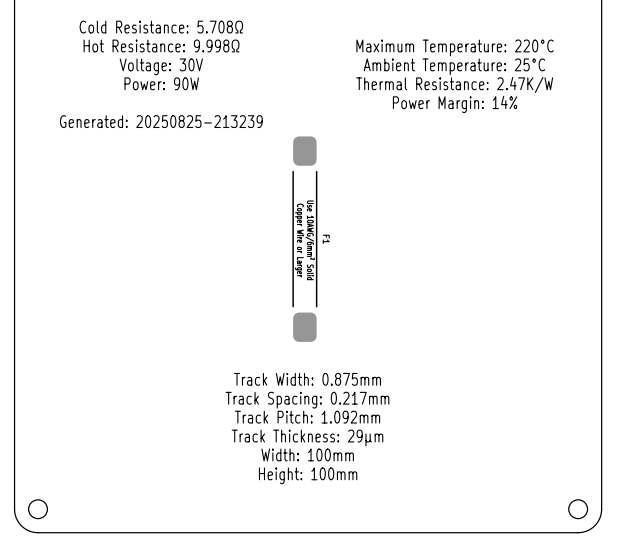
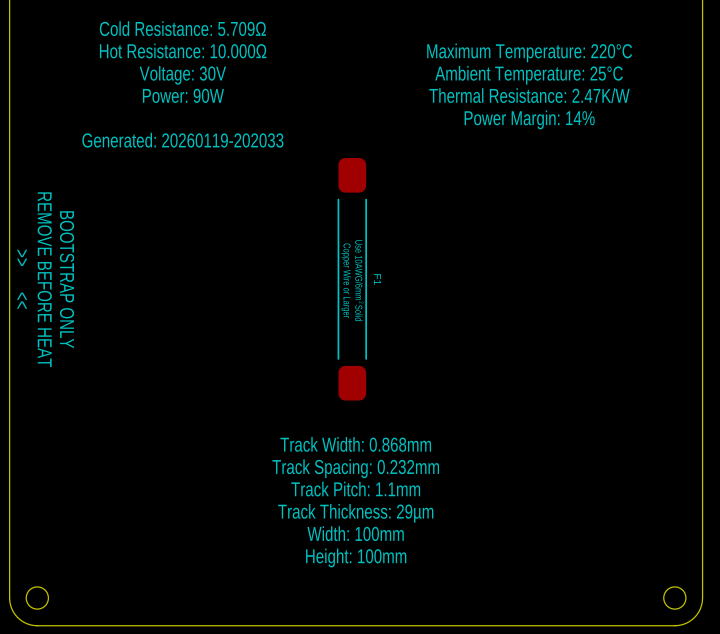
text: Cold Resistance: 5.708Ω (161, 27) -> Cold Resistance: 5.709Ω (182, 28)
text: Hot Resistance: 9.998Ω (161, 45) -> Hot Resistance: 10.000Ω (183, 50)
text: Generated: 20250825-213239 (161, 121) -> Generated: 20260119-202033 (182, 140)
text: none -> >> << (22, 279)
text: none -> REMOVE BEFORE HEAT (44, 279)
text: none -> BOOTSTRAP ONLY (67, 279)
text: Track Width: 0.875mm (307, 379) -> Track Width: 0.868mm (355, 444)
text: Track Spacing: 0.217mm (307, 400) -> Track Spacing: 0.232mm (355, 468)
text: Track Pitch: 1.092mm (307, 417) -> Track Pitch: 1.1mm (355, 489)

